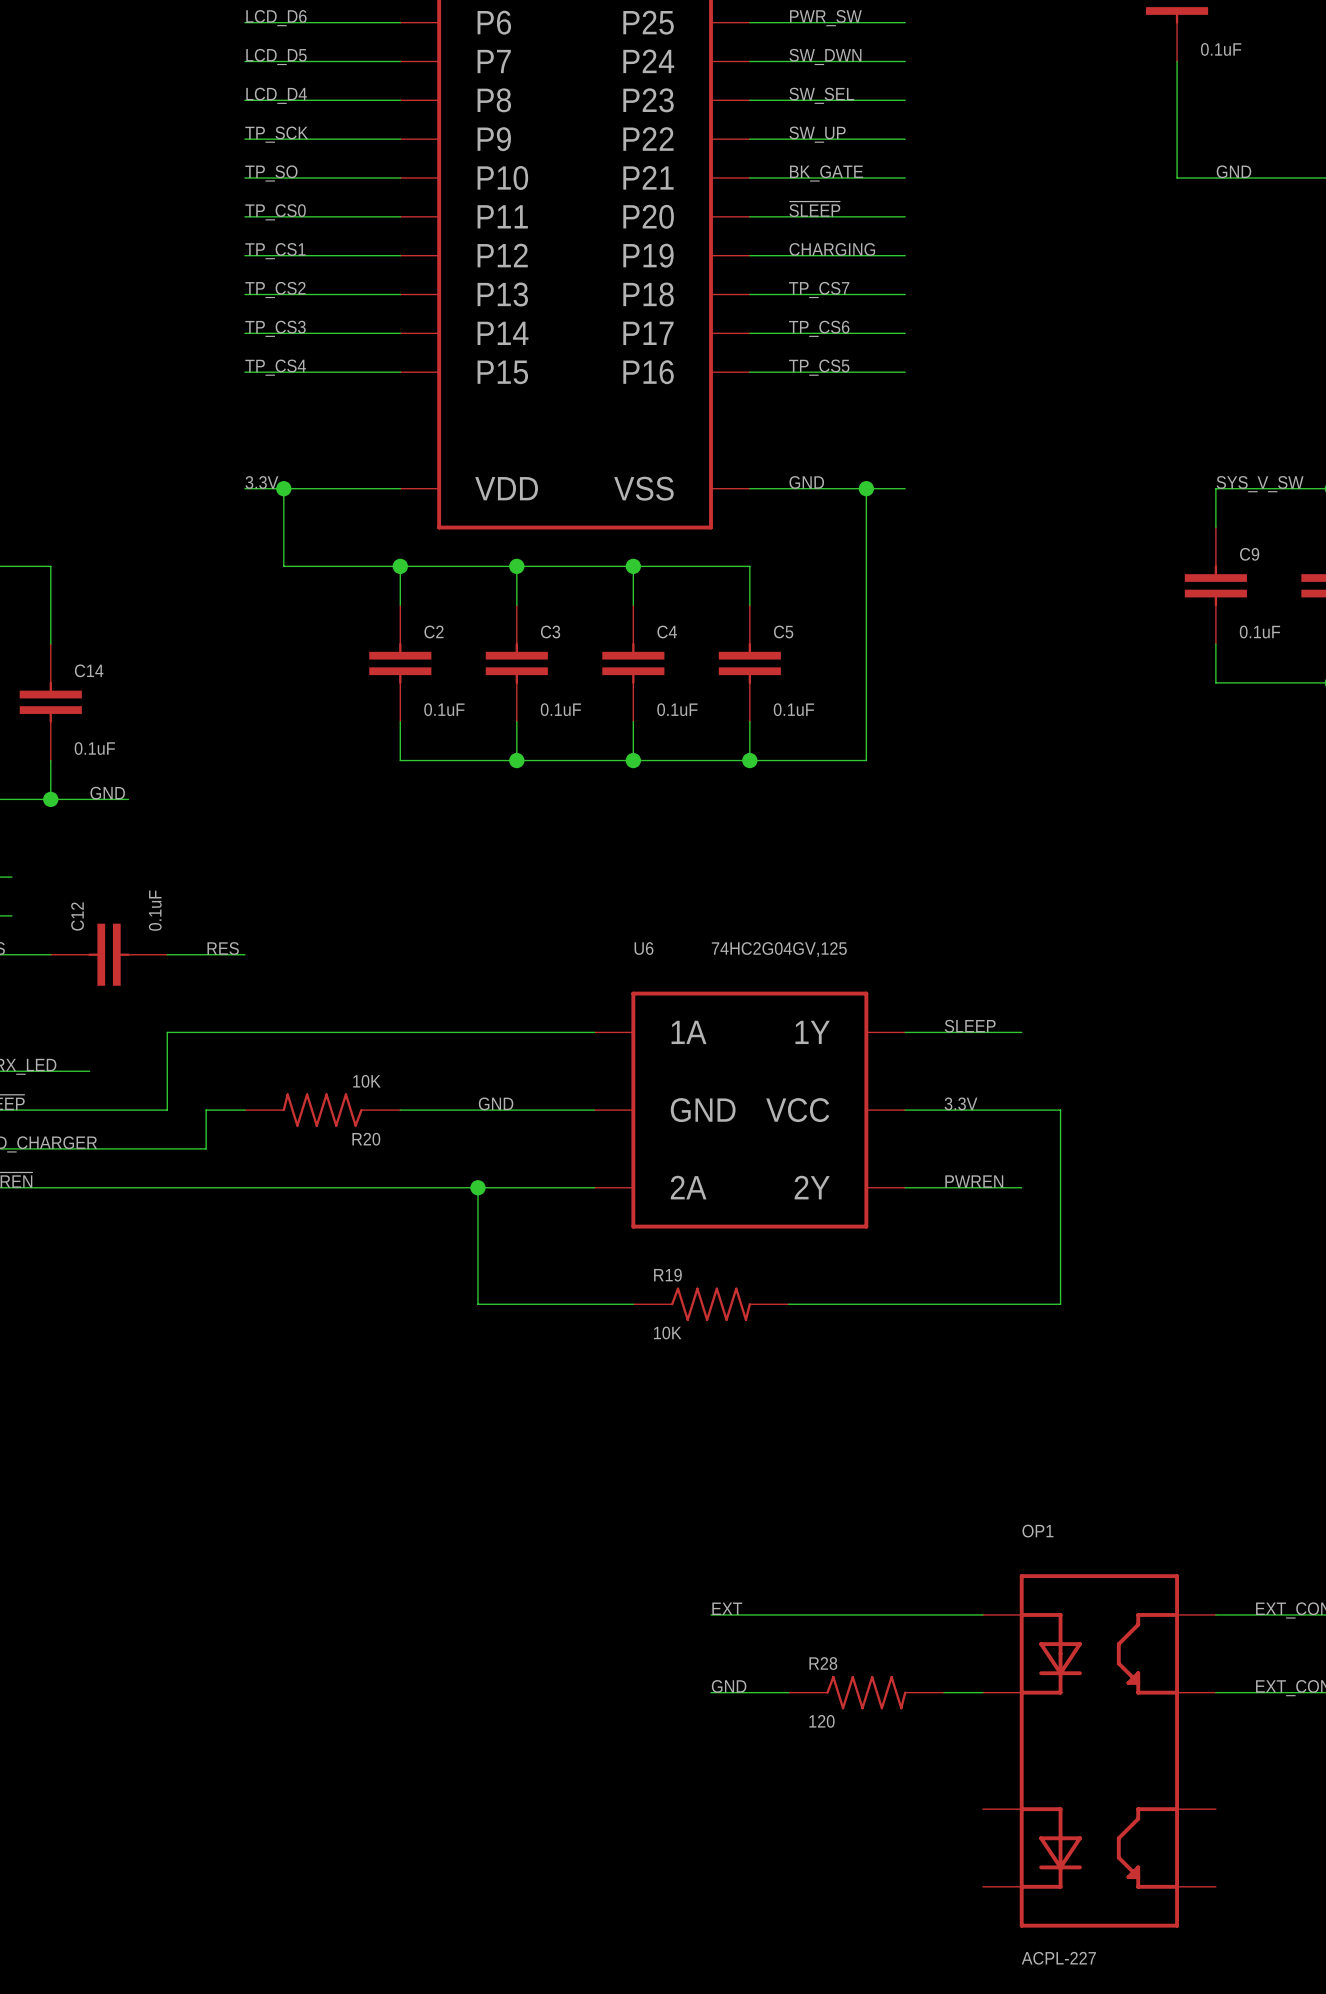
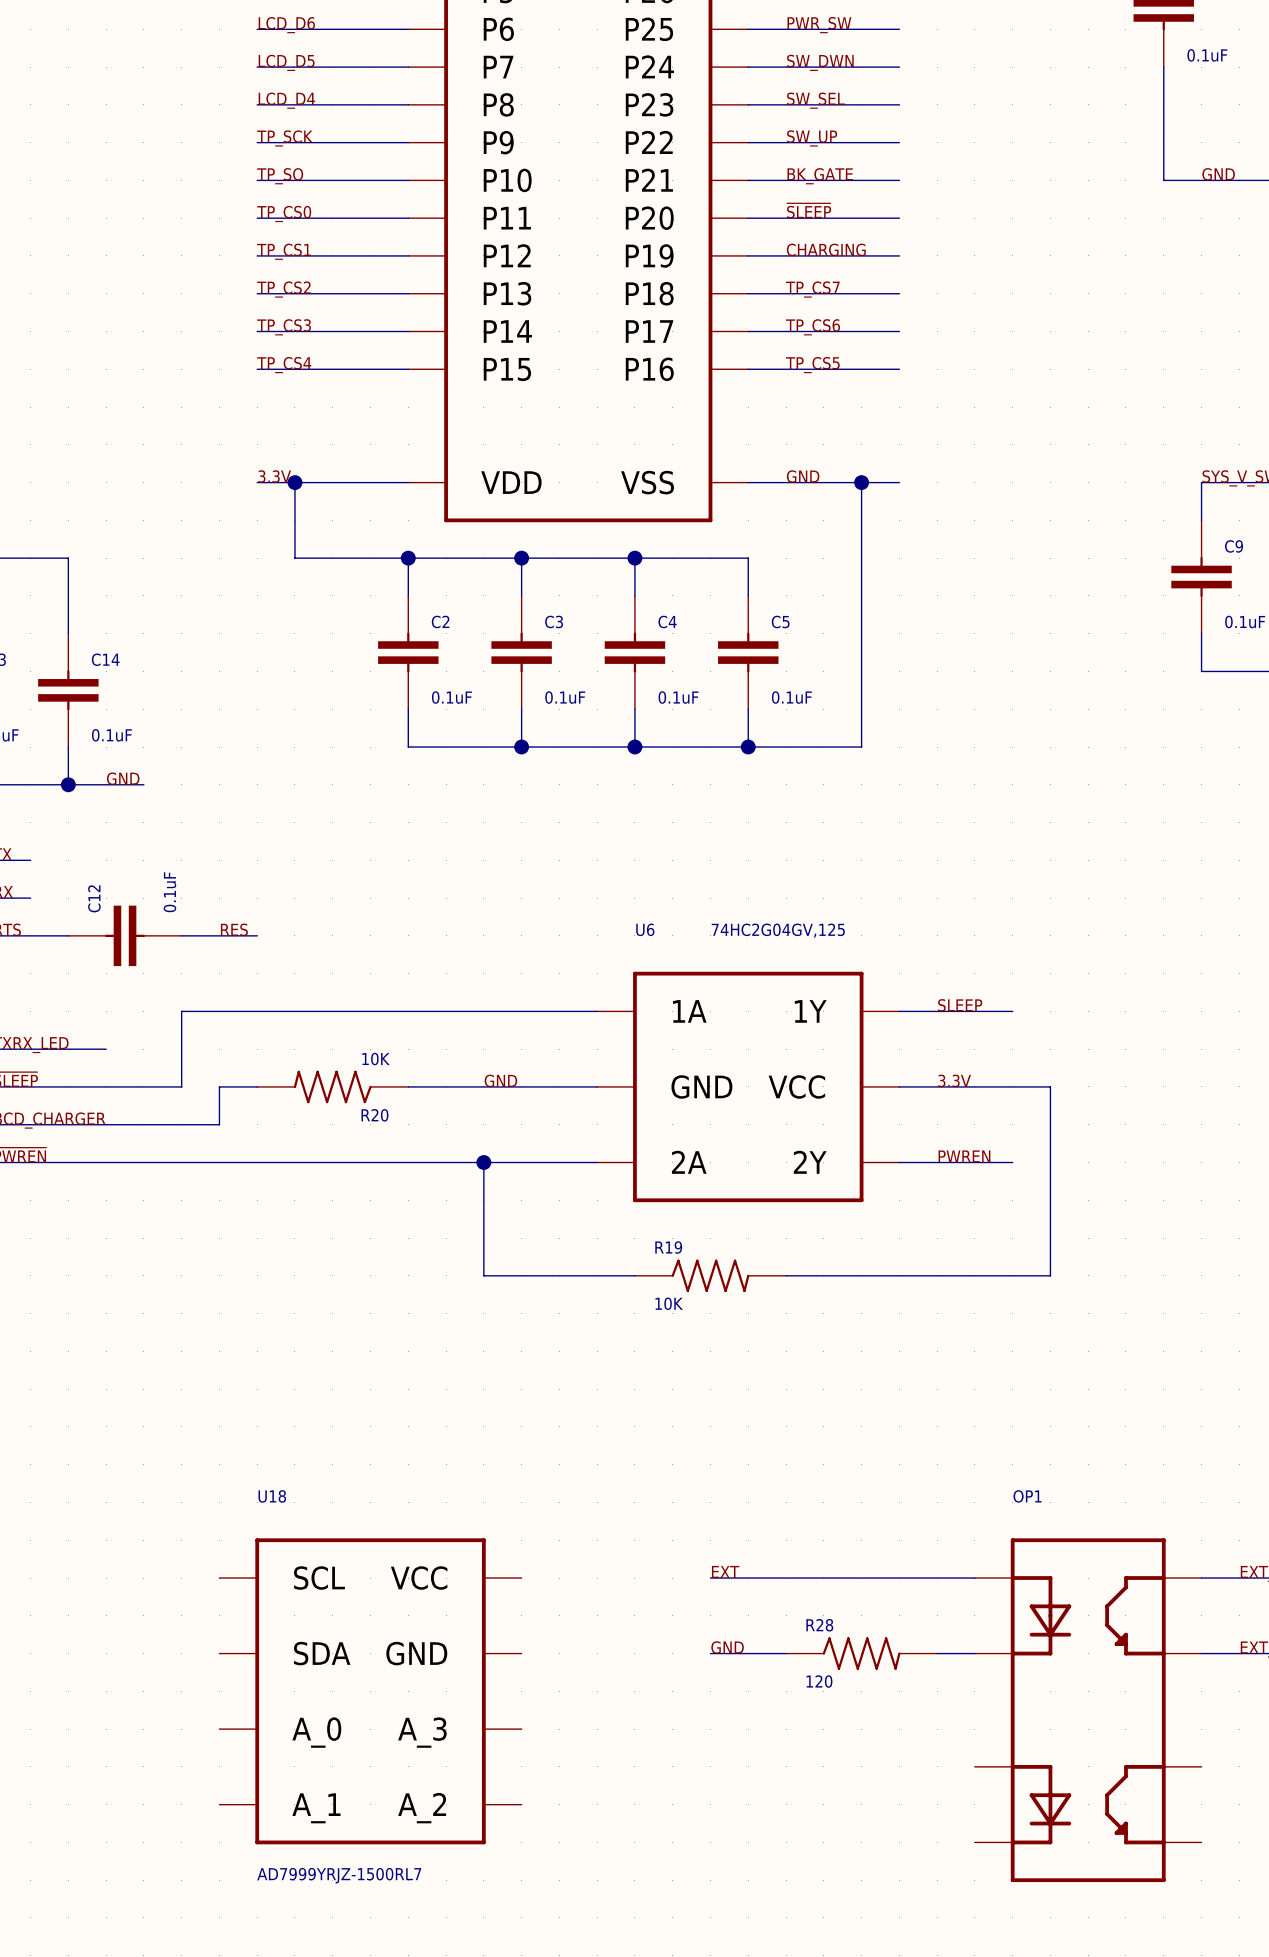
U18: none -> AD7999YRJZ-1500RL7 (370, 1691)
OP1 value: ACPL-227 (1058, 1958) -> none

